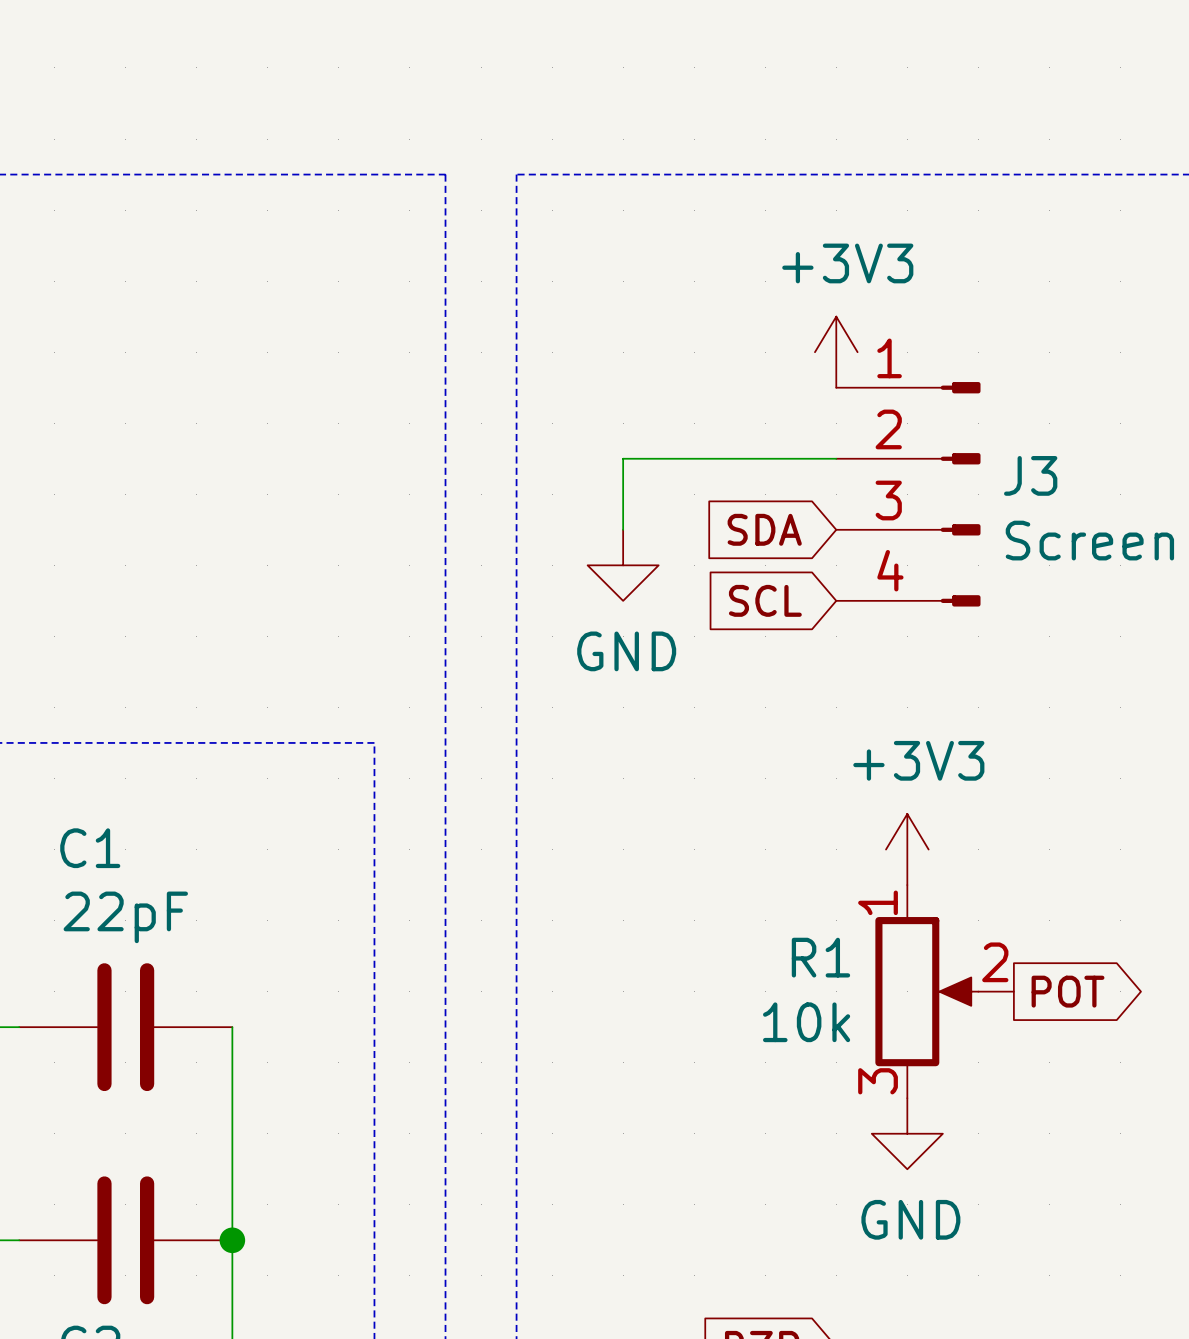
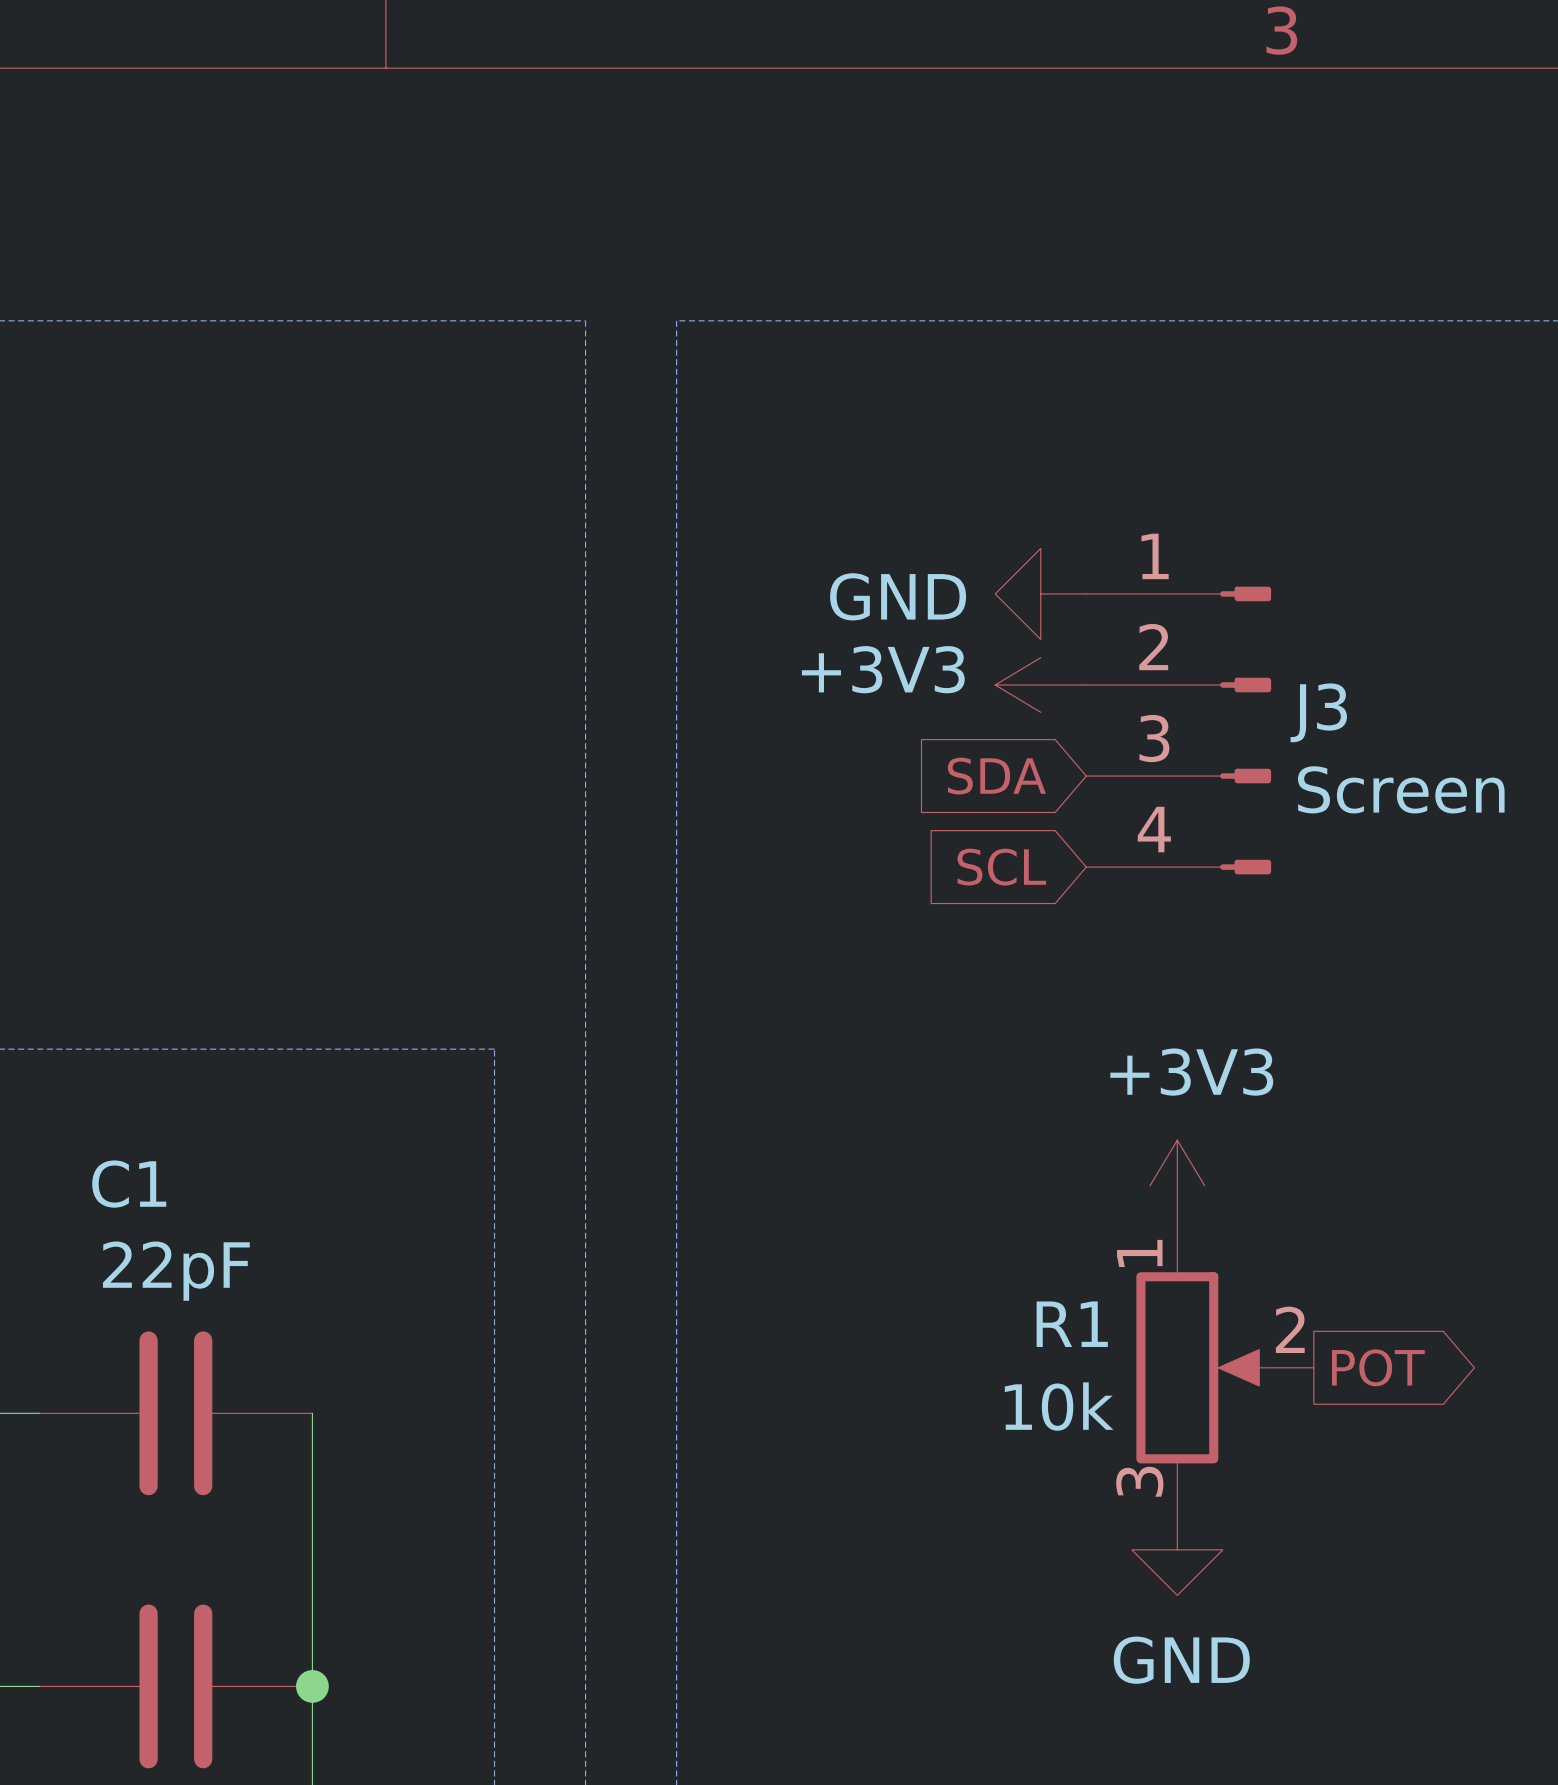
power symbol rotation: 0° (836, 352) -> 90° counterclockwise (1040, 685)
power symbol position: +3V3 (836, 352) -> +3V3 (1040, 685)
wire: (836, 458) (623, 458) (623, 529) -> none
power symbol rotation: 0° (623, 565) -> 90° clockwise (1040, 593)
power symbol position: GND (623, 565) -> GND (1040, 593)

